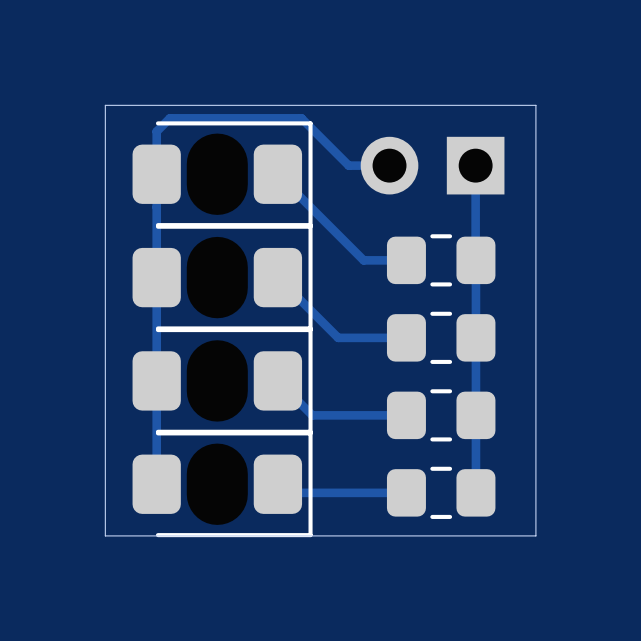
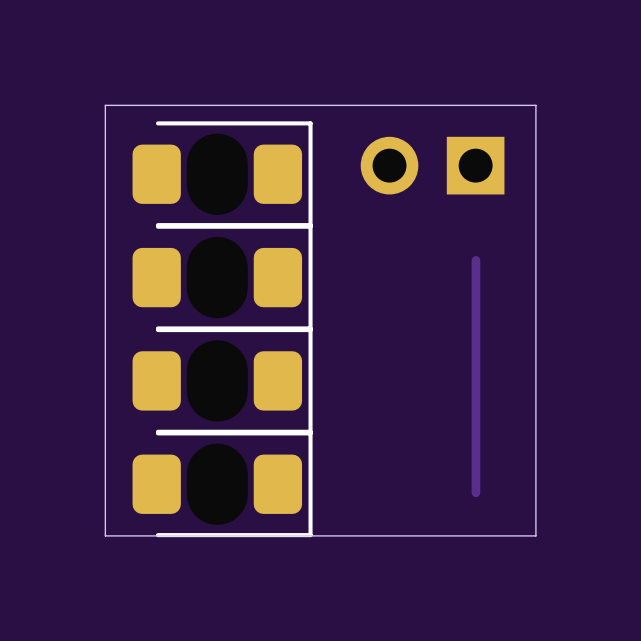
track: (389, 165) (348, 165) (301, 118) (169, 118) (156, 131) (156, 484) -> none
track: (475, 165) (475, 260) -> none
track: (277, 174) (363, 260) (406, 260) -> none
part: (441, 260) -> none
track: (277, 277) (338, 337) (406, 337) -> none
part: (441, 337) -> none
track: (277, 380) (312, 415) (406, 415) -> none
part: (441, 415) -> none
track: (277, 484) (286, 492) (406, 492) -> none
part: (441, 492) -> none

